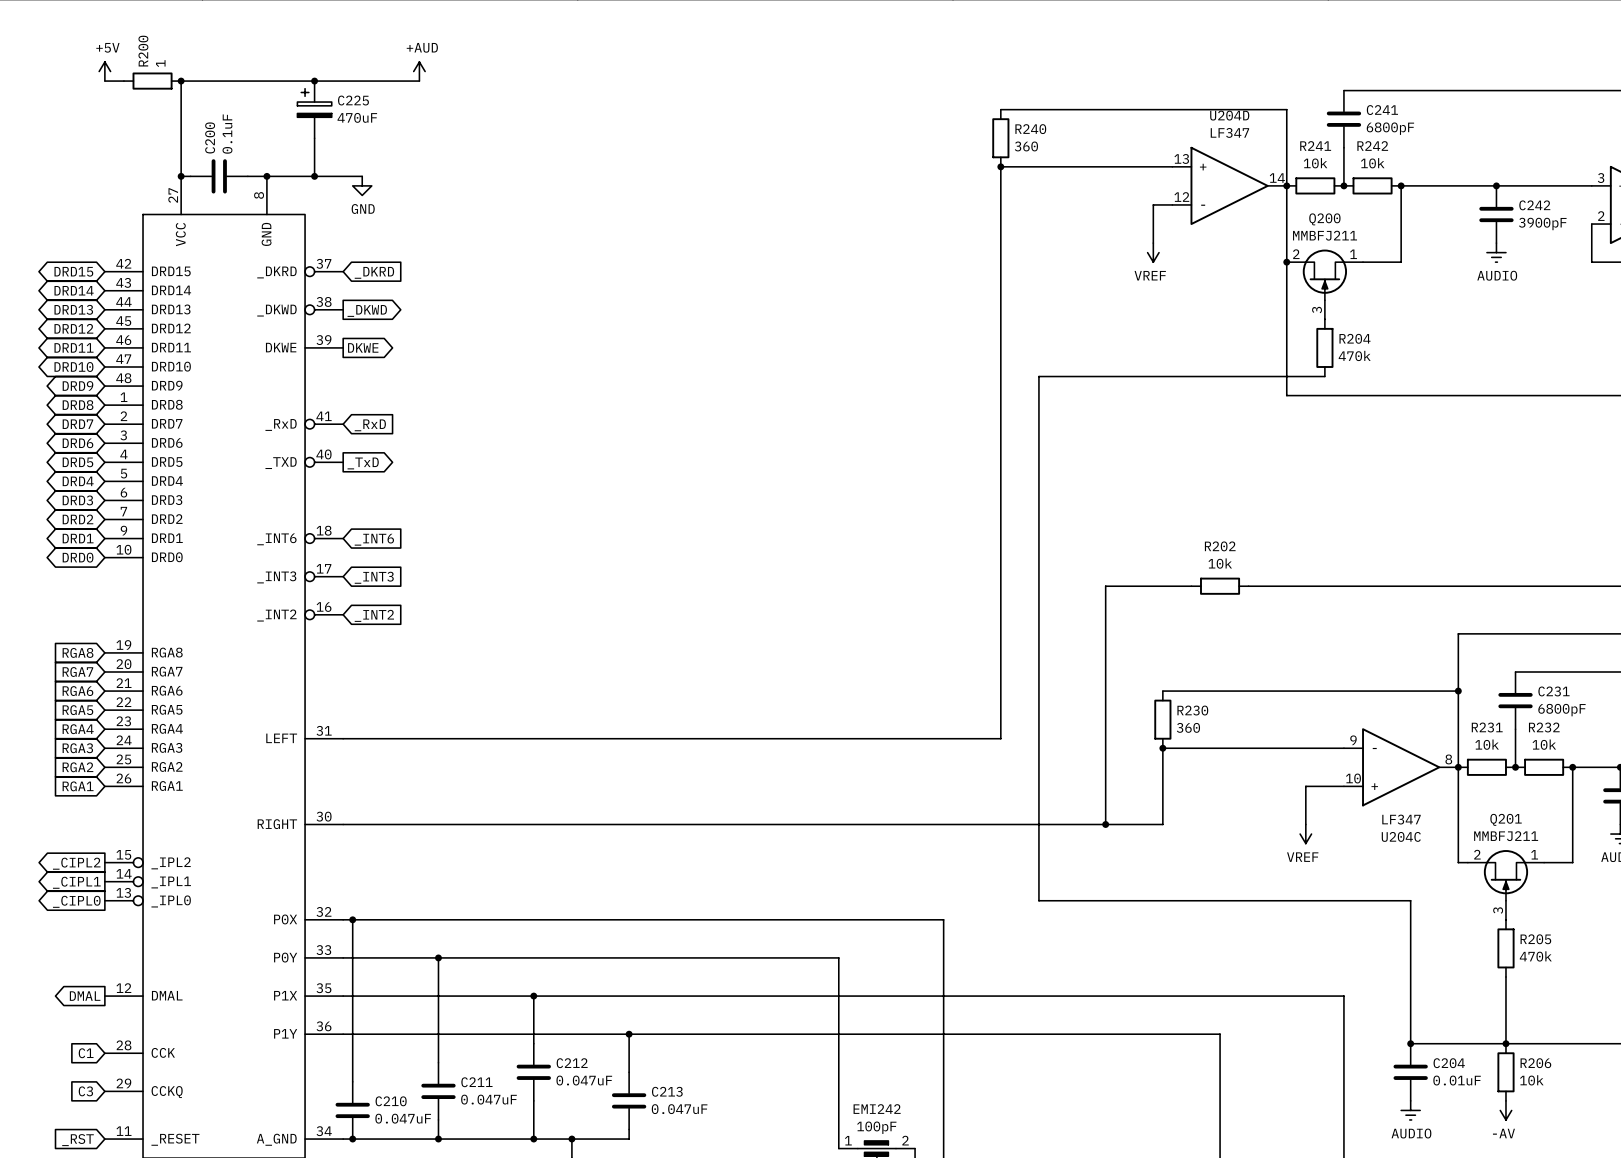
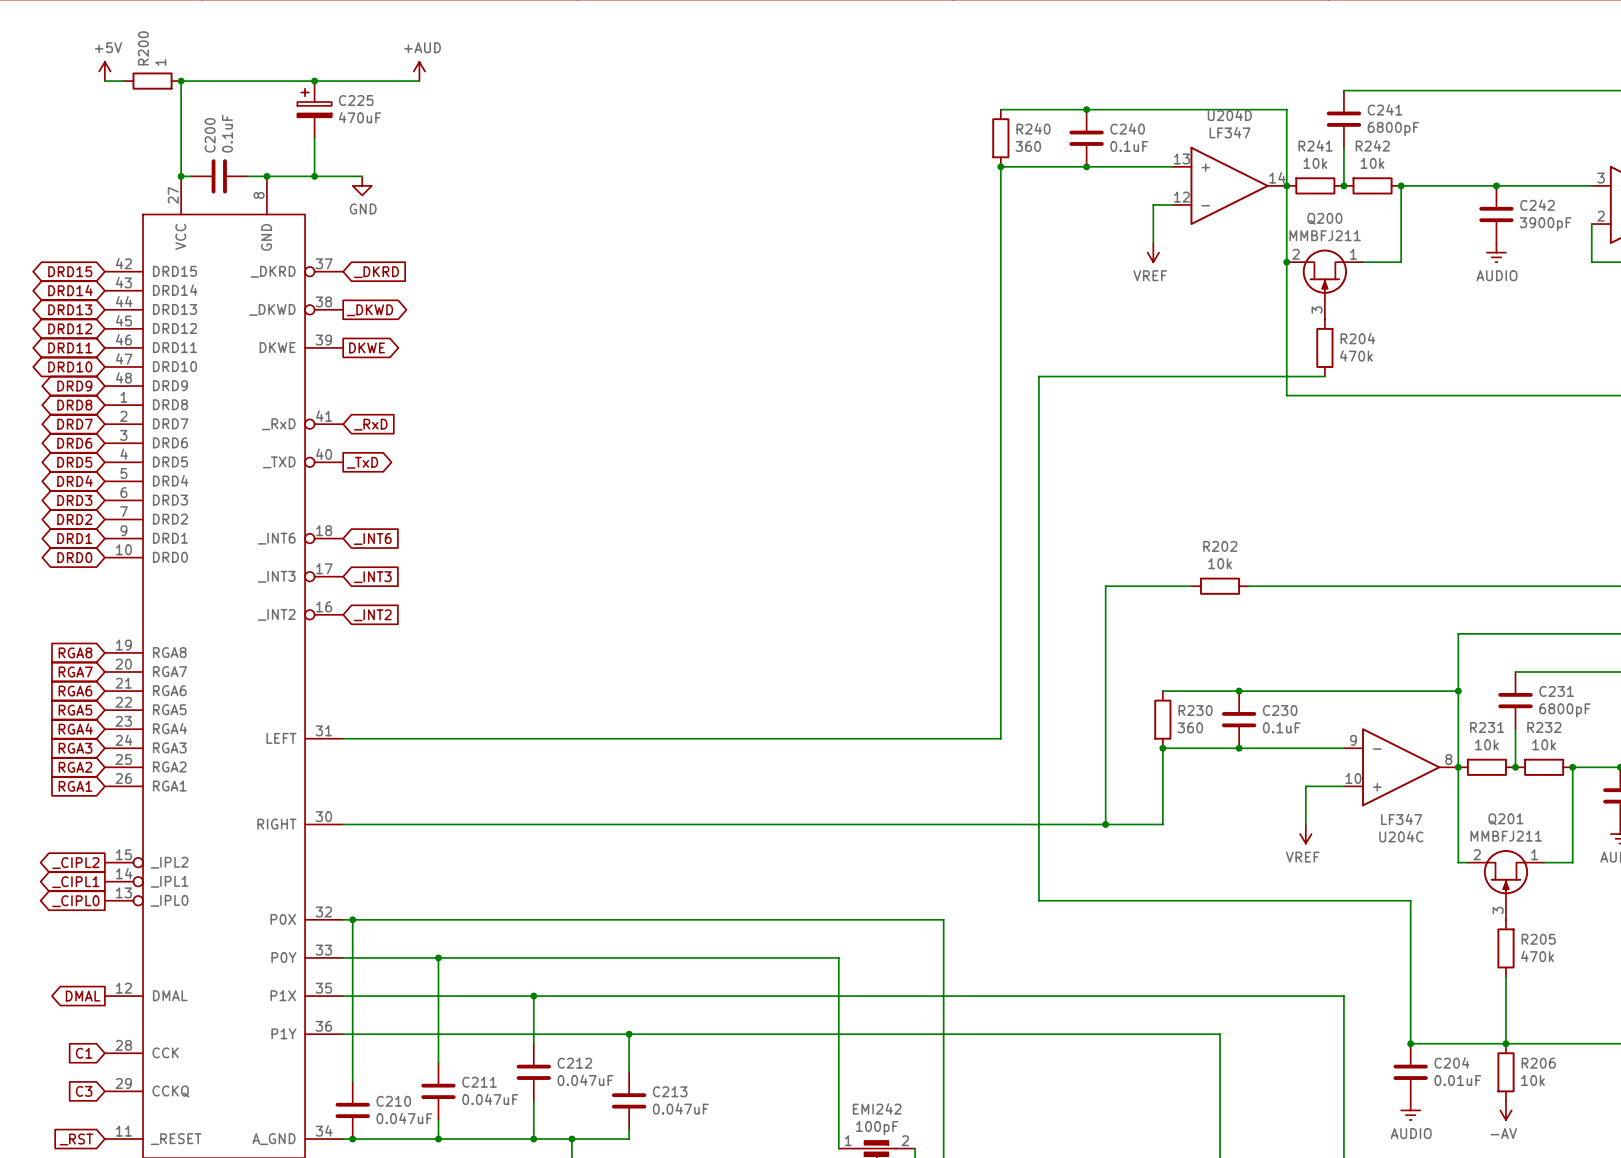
junction: none -> (1086, 109)
C240: none -> 0.1uF (1086, 138)
junction: none -> (1086, 166)
junction: none -> (1239, 691)
C230: none -> 0.1uF (1239, 719)
junction: none -> (1239, 748)

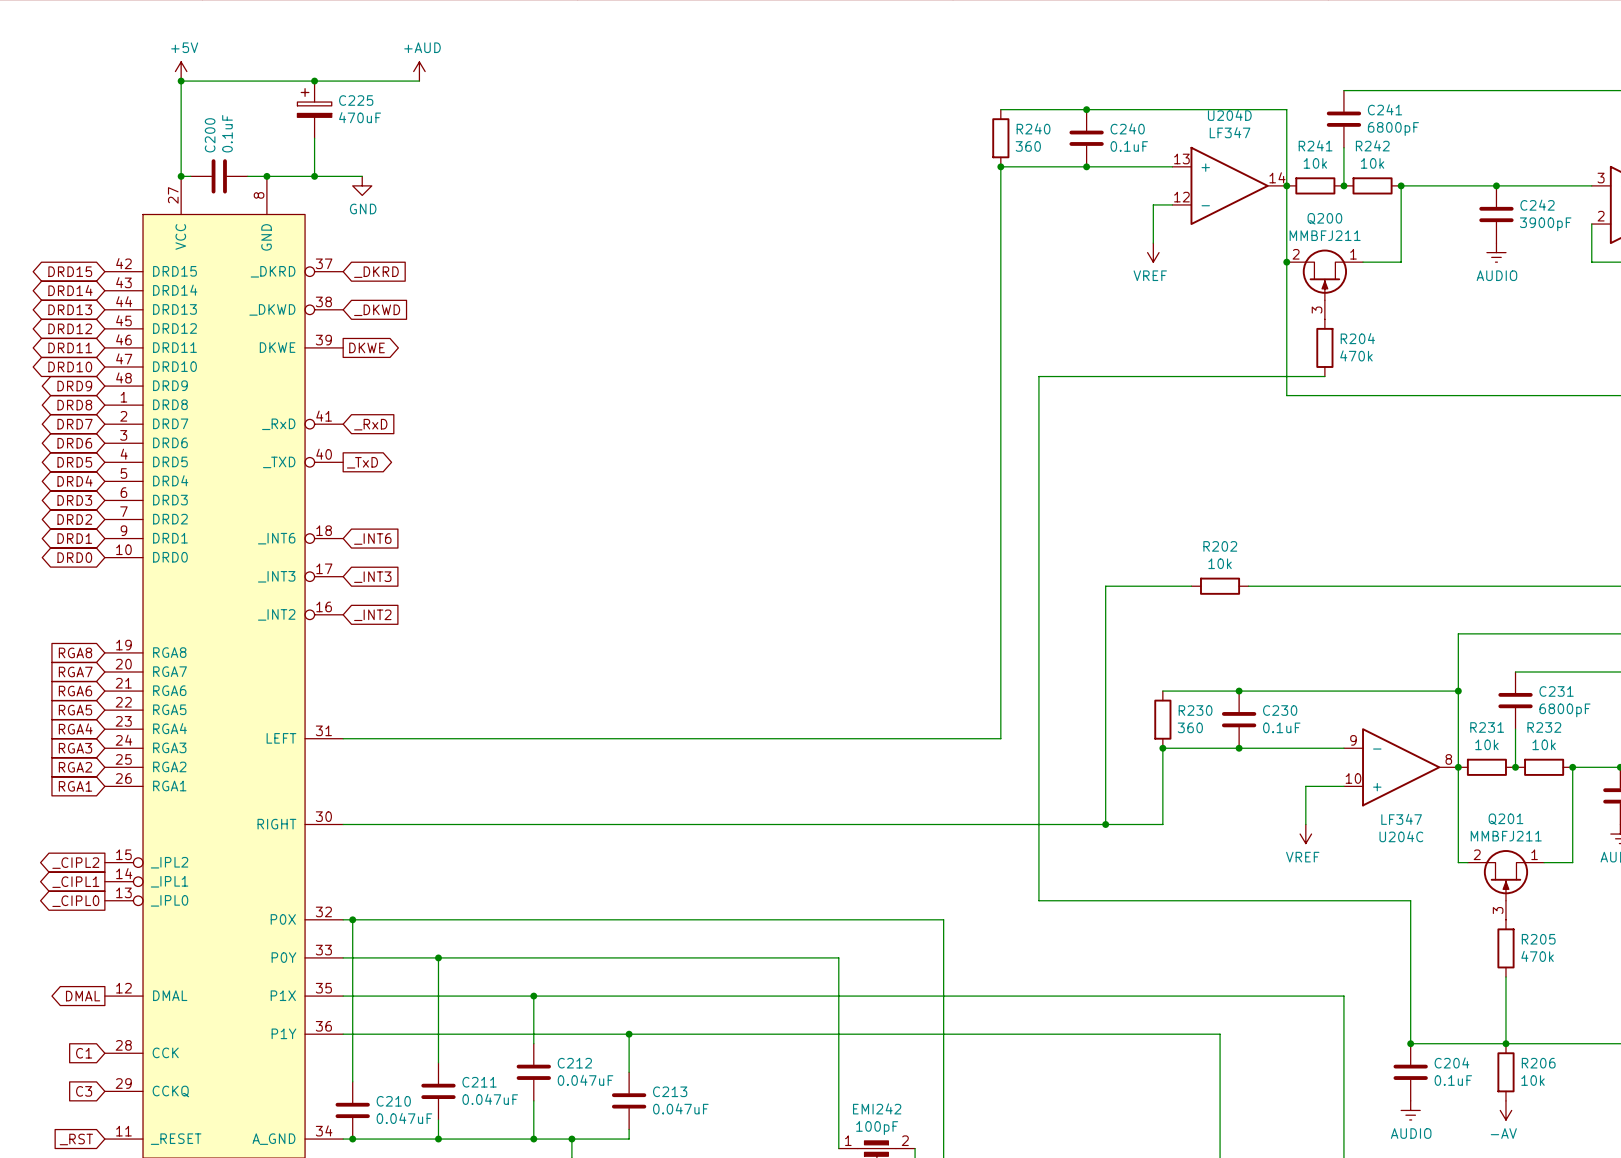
power symbol position: +5V (104, 71) -> +5V (181, 71)
wire: (104, 81) (123, 81) -> none
R200: 1 (152, 81) -> none
global label shape: output (369, 310) -> input (377, 310)
C204 value: 0.01uF (1457, 1080) -> 0.1uF (1453, 1080)

